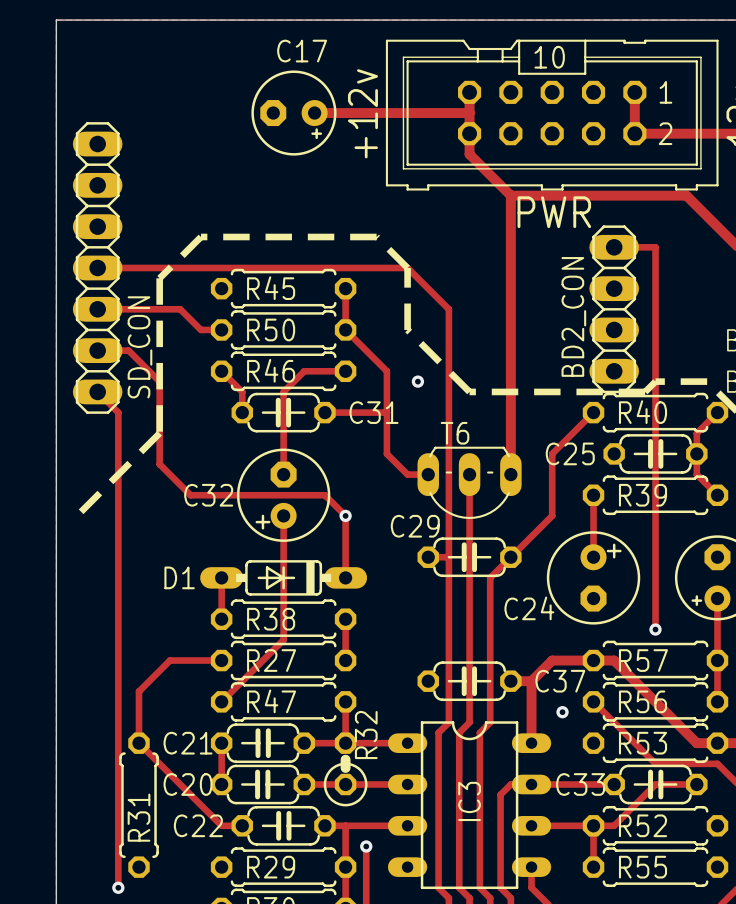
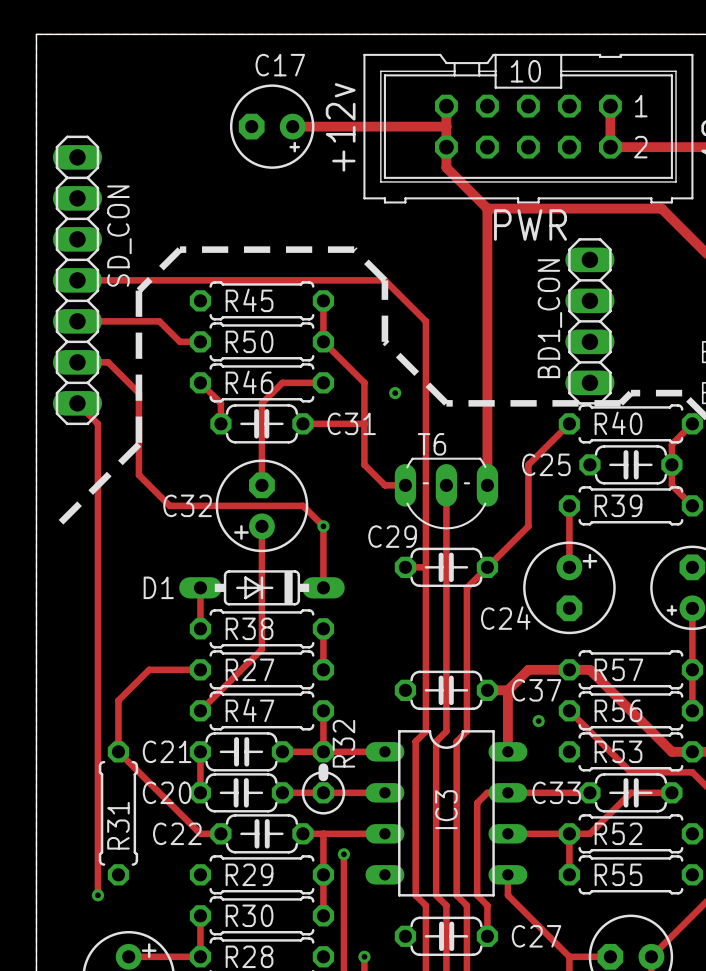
track: (614, 247) (655, 247) (655, 629) -> none
BD2_CON name: BD2_CON (573, 316) -> BD1_CON (549, 318)
SD_CON name position: SD_CON (139, 347) -> SD_CON (119, 236)
via: (655, 629) -> none

